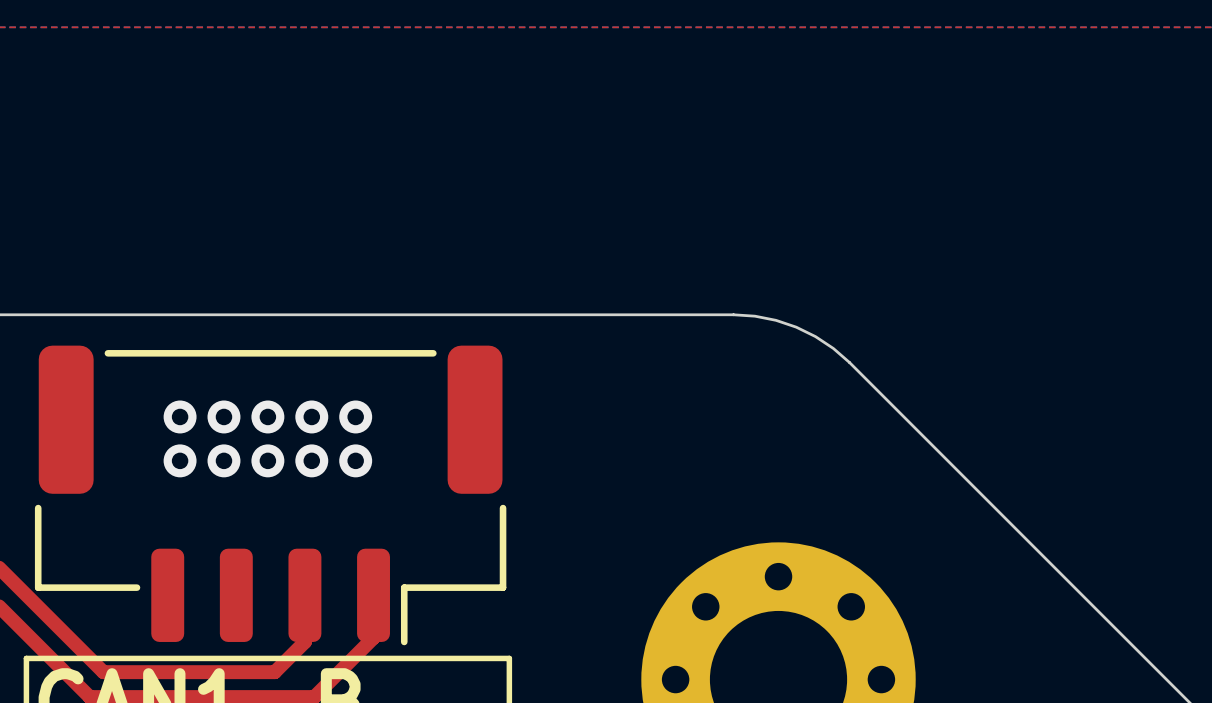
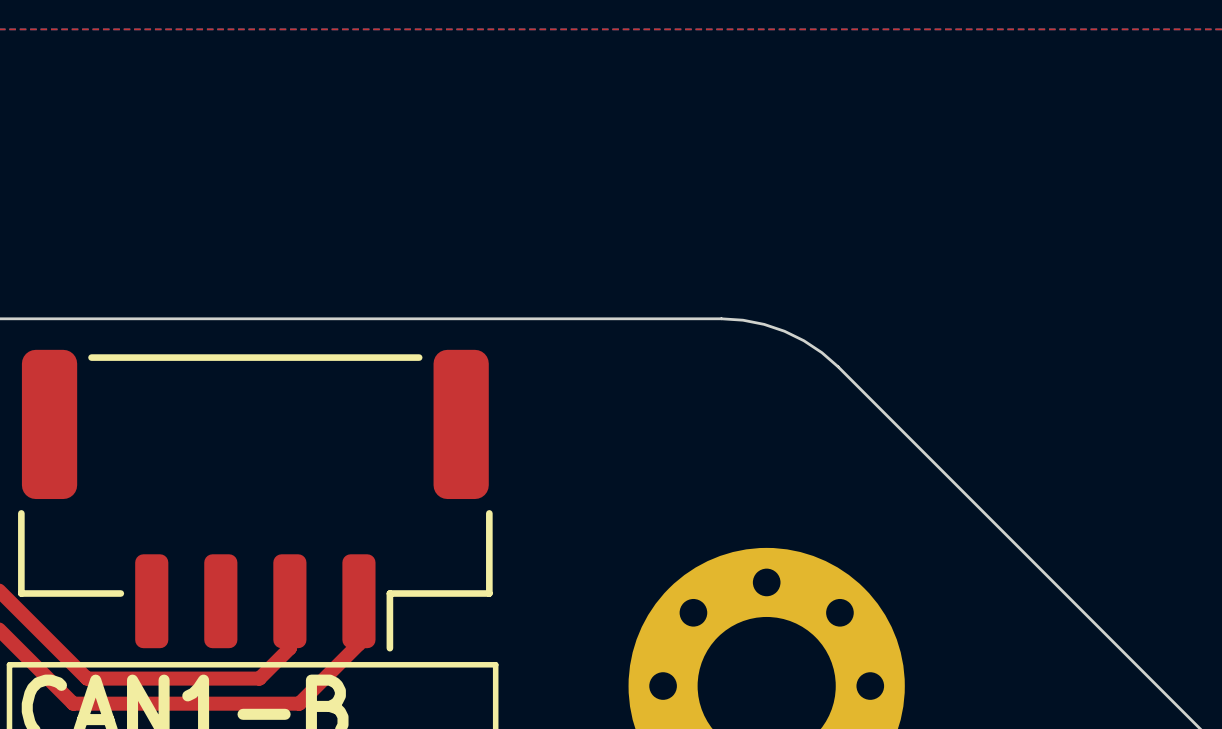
via: (180, 416) -> none
via: (223, 416) -> none
via: (267, 416) -> none
via: (311, 416) -> none
via: (355, 416) -> none
via: (180, 460) -> none
via: (223, 460) -> none
via: (267, 460) -> none
via: (311, 460) -> none
via: (355, 460) -> none

